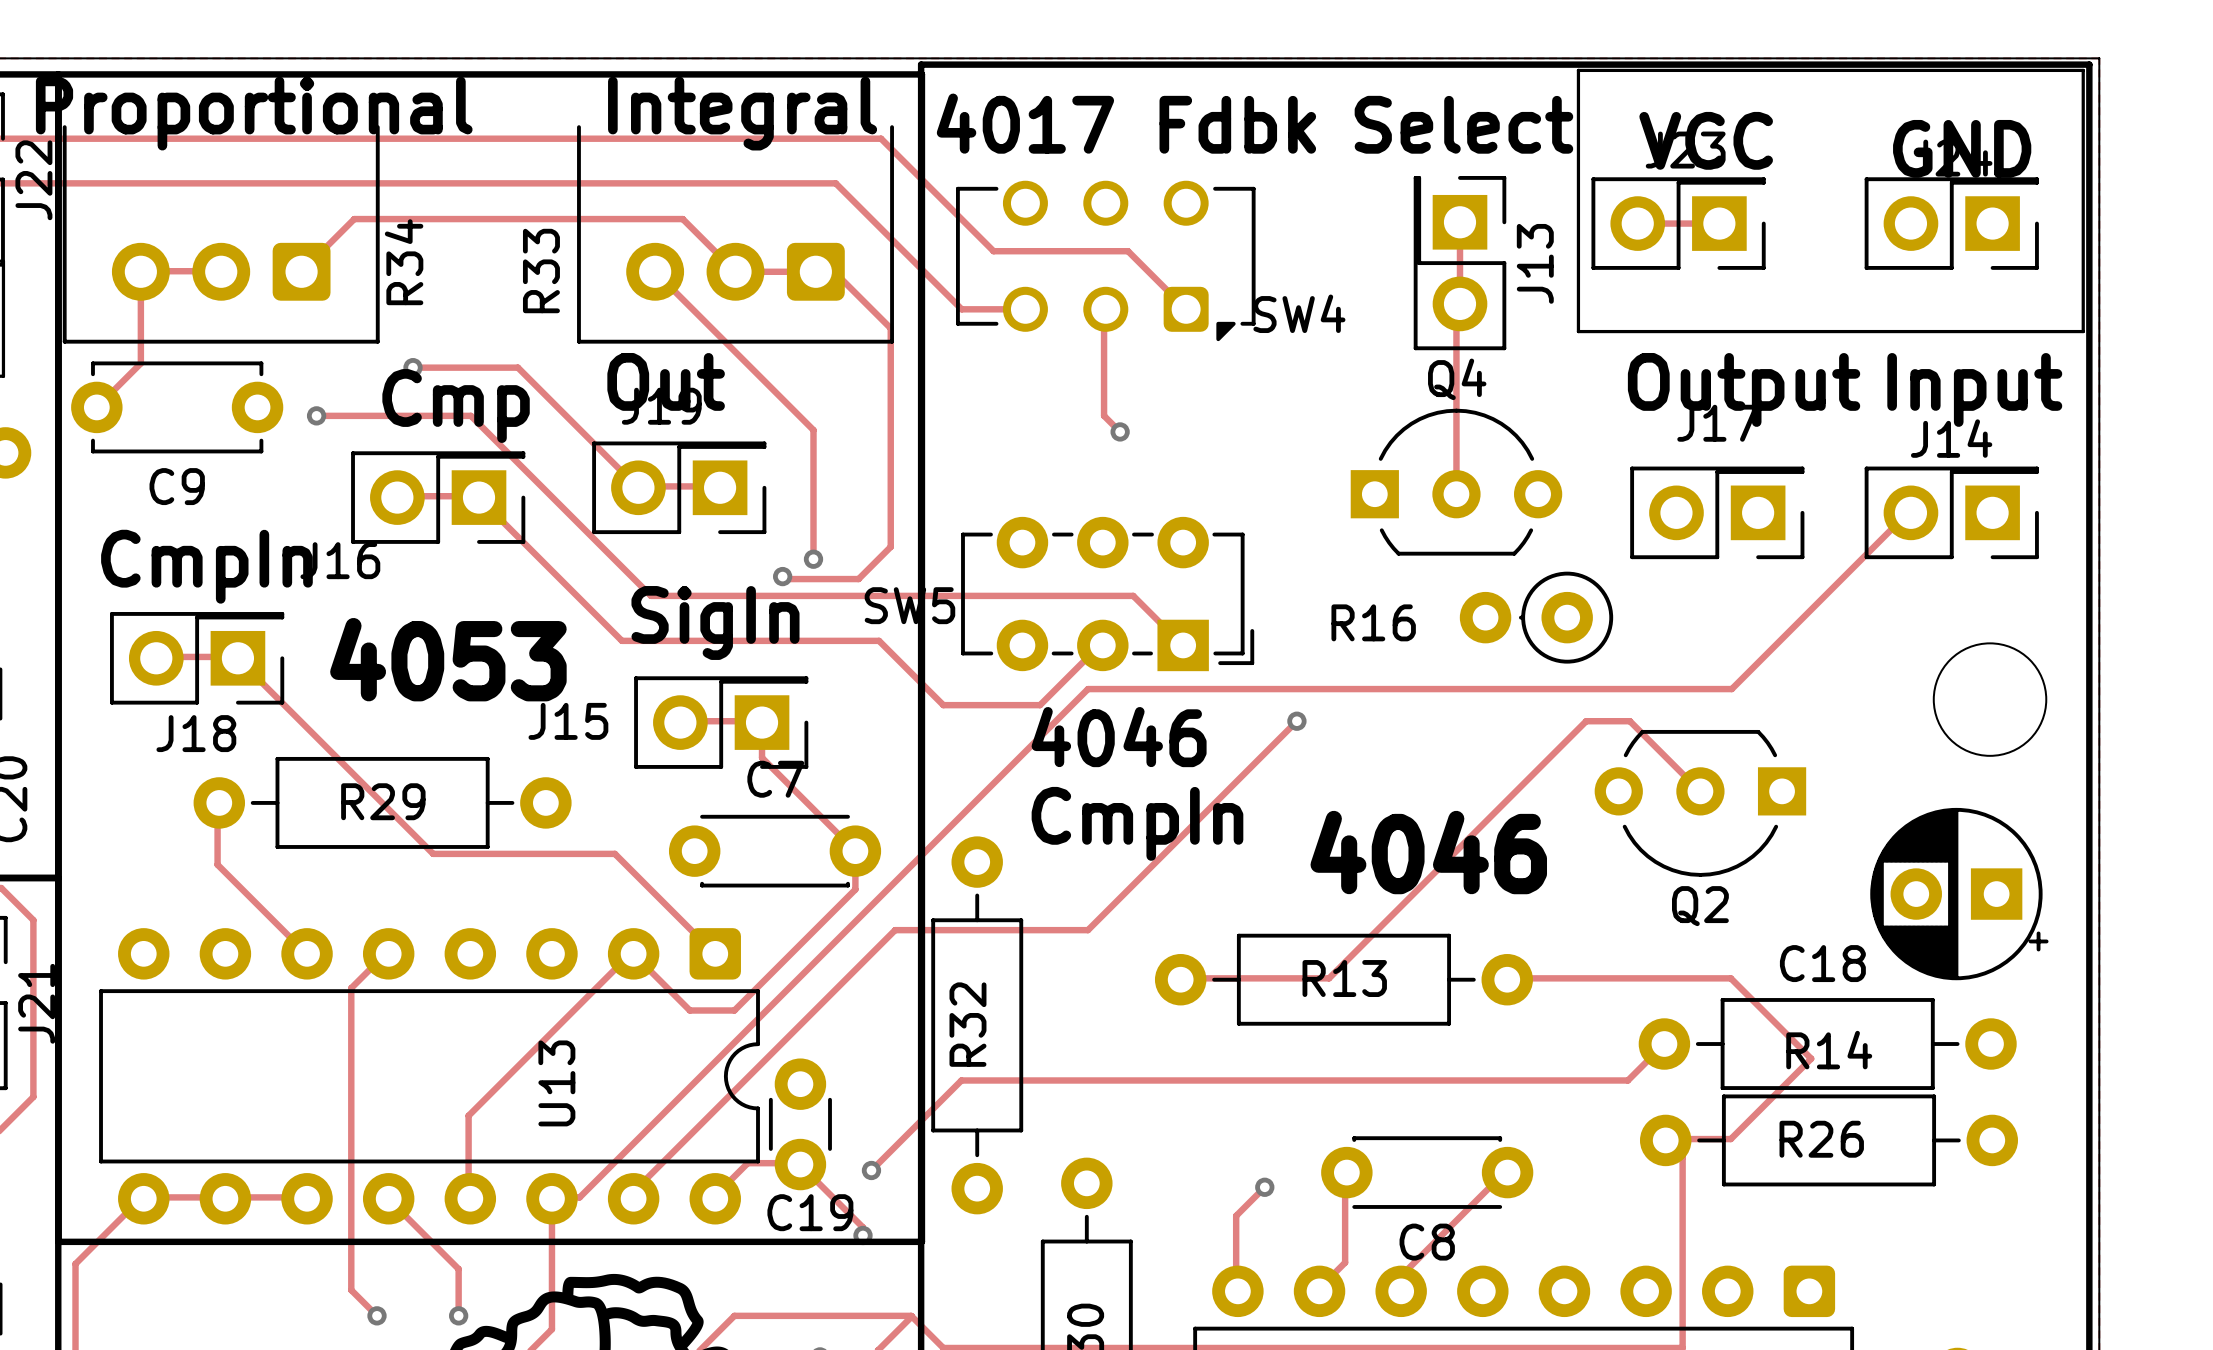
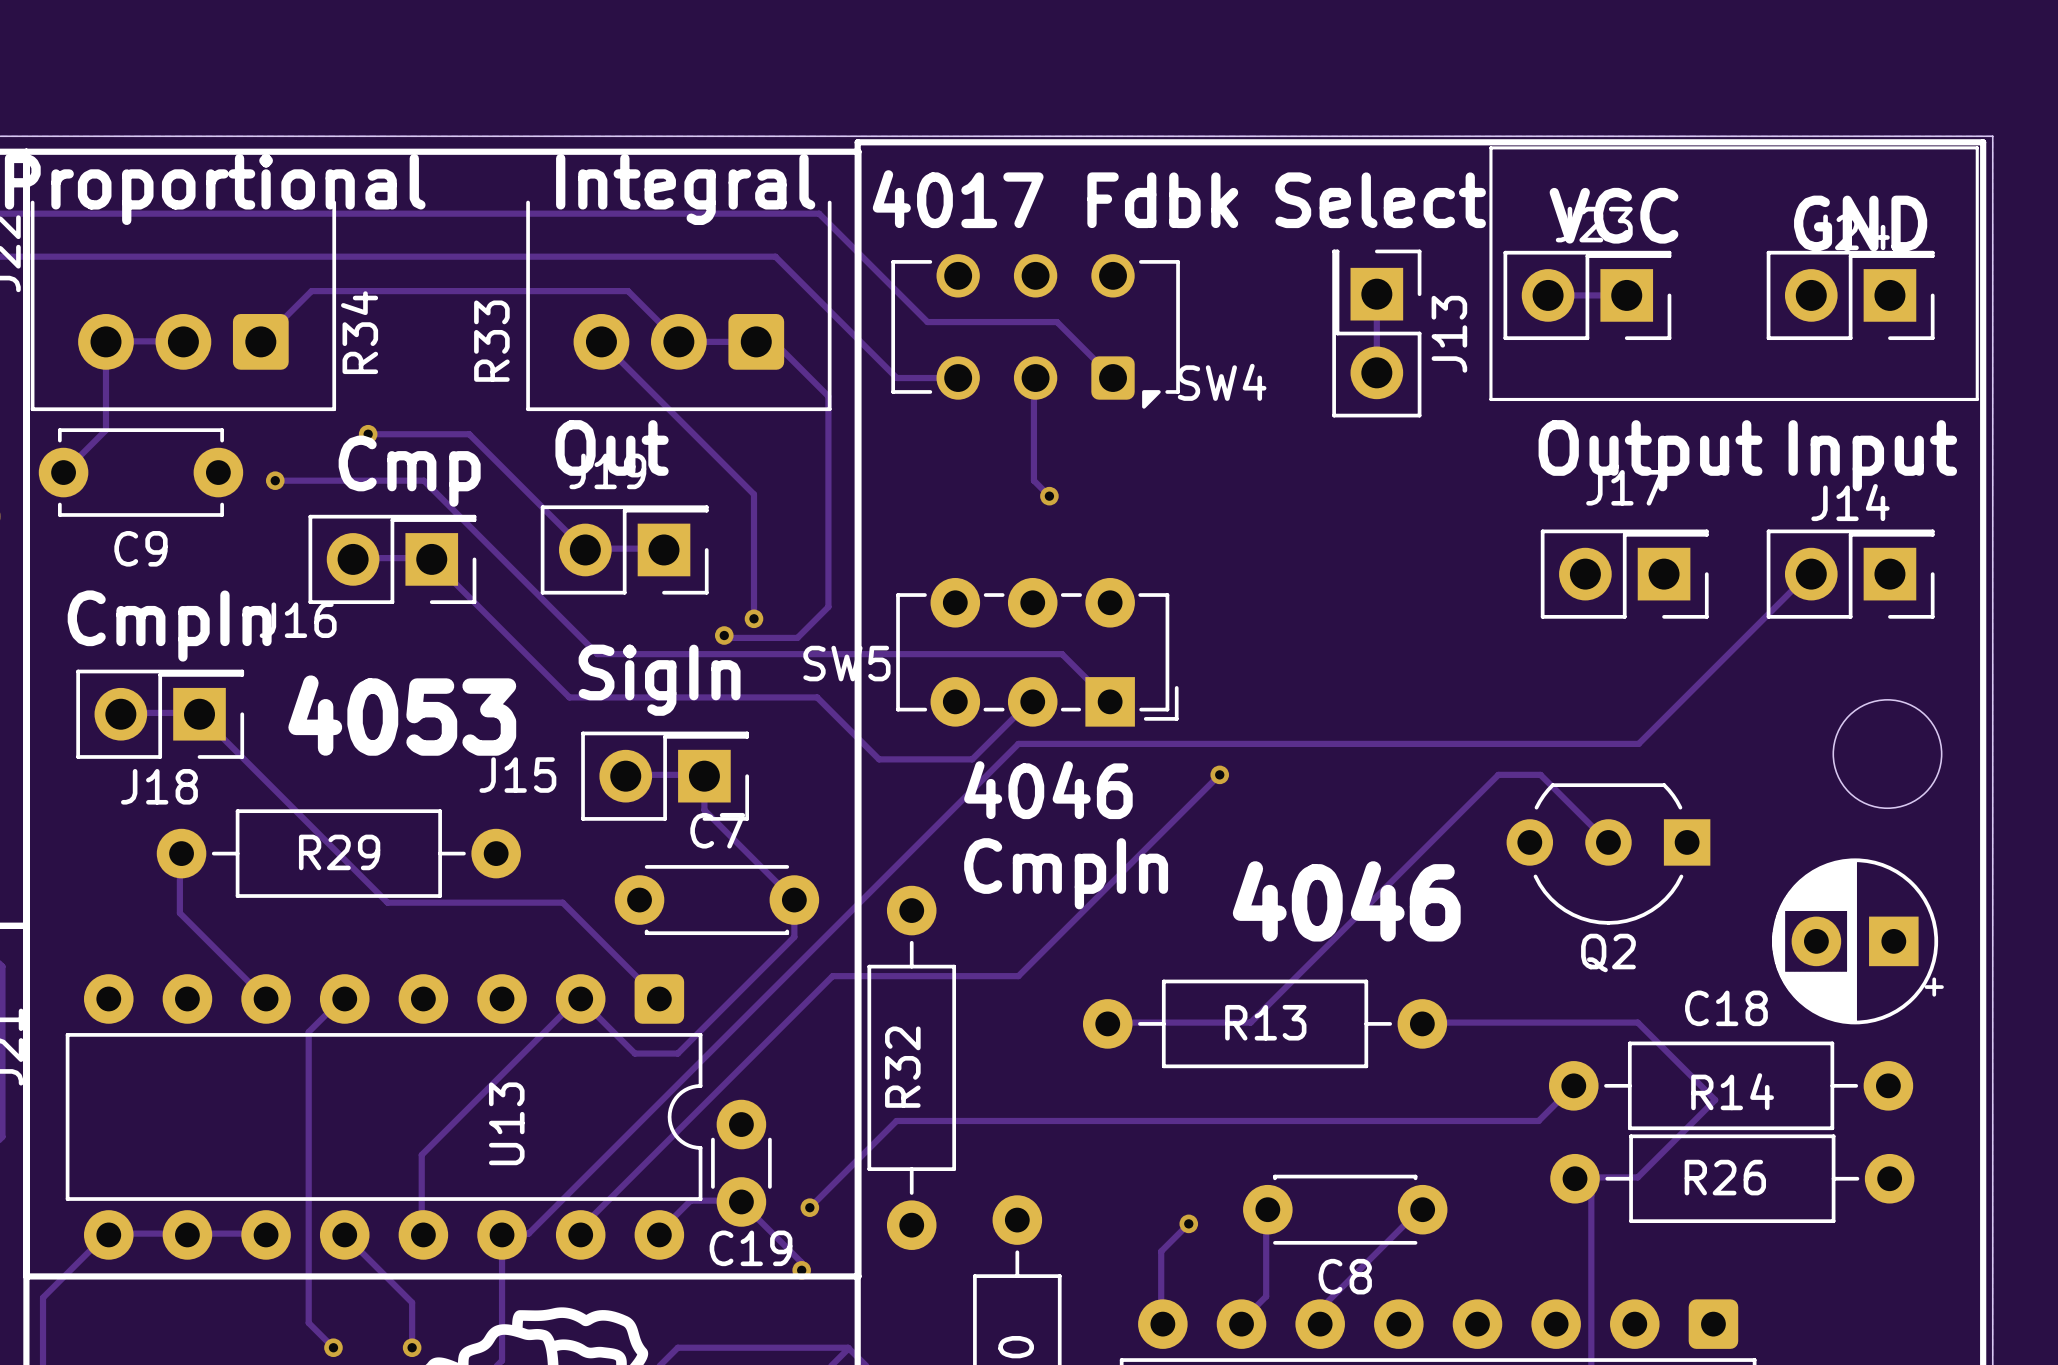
track: (1460, 303) (1456, 307) (1456, 494) -> none
Q4: (1456, 482) -> none
R16: (1536, 617) -> none

